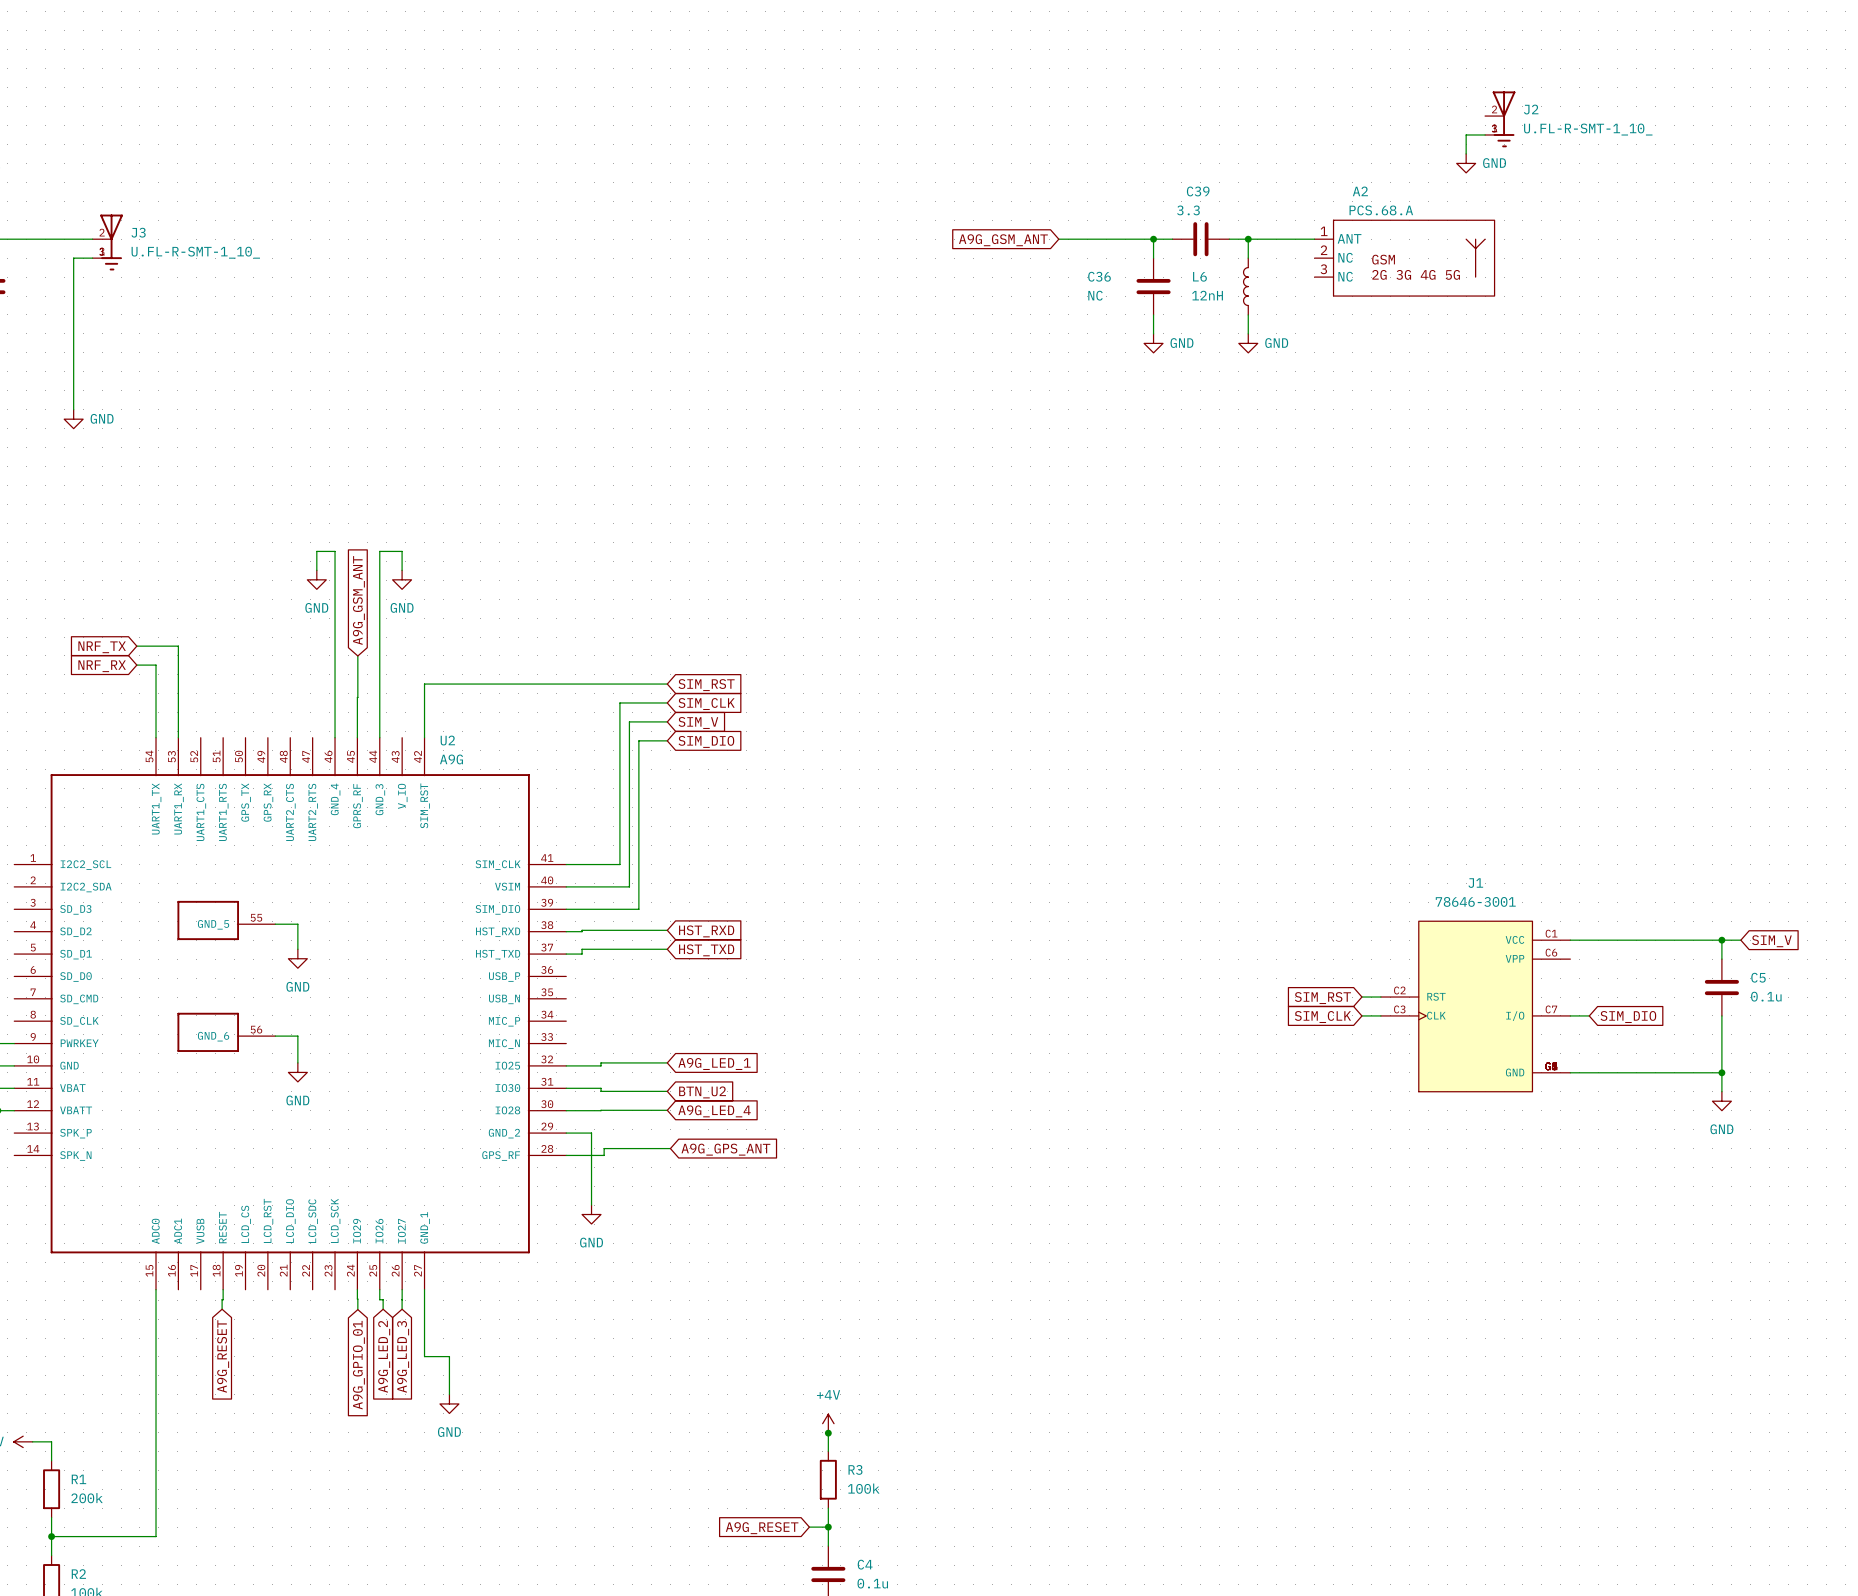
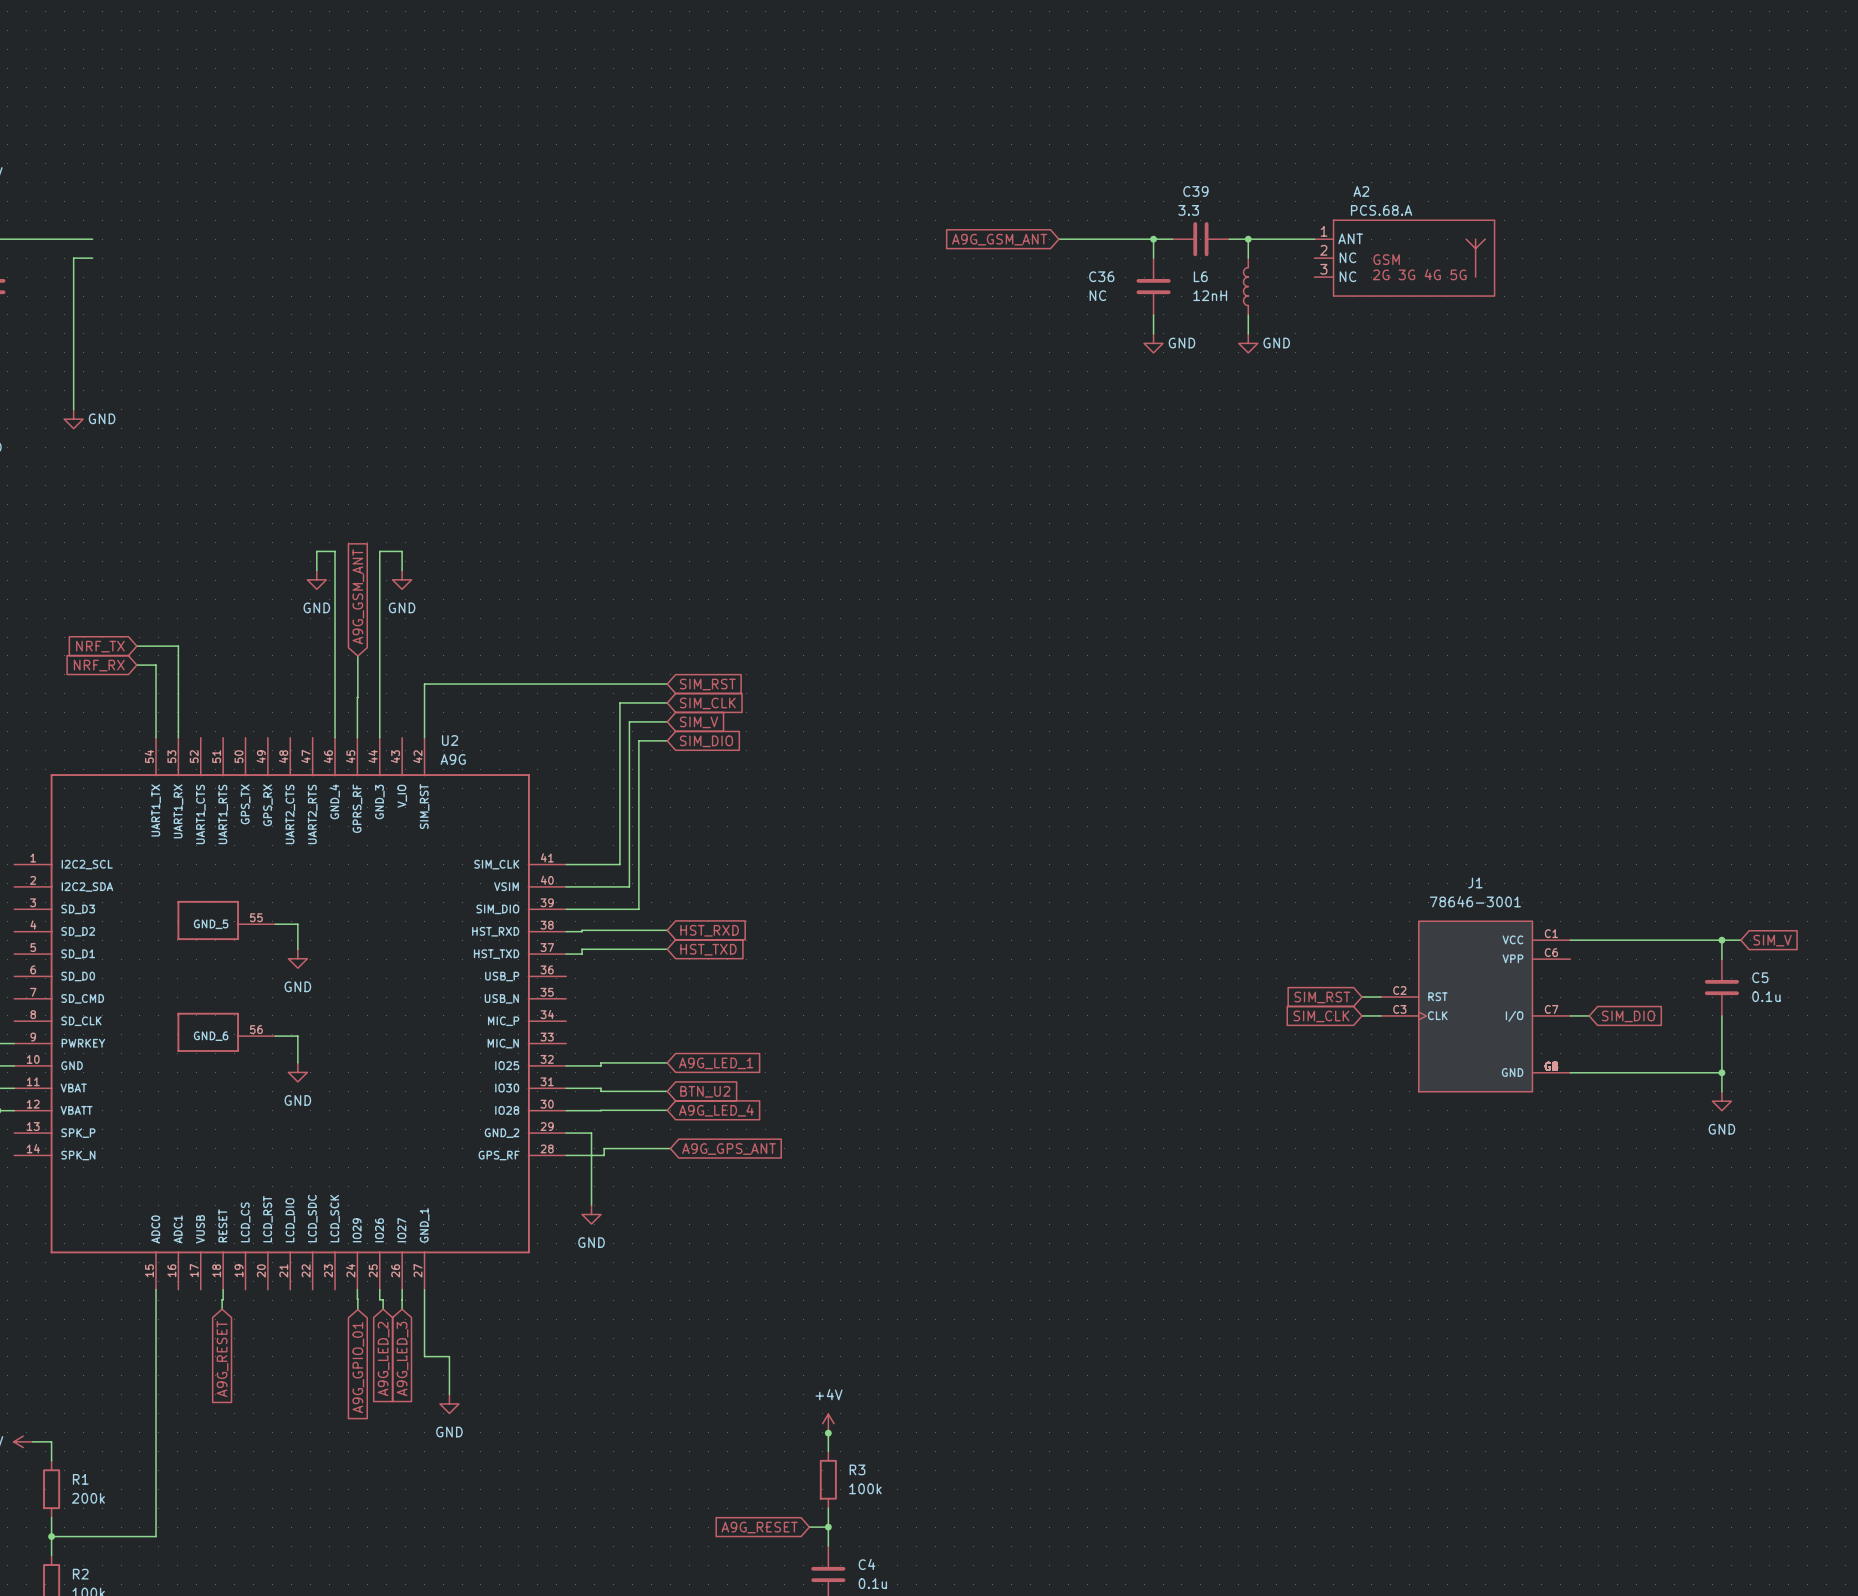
J2: U.FL-R-SMT-1_10_ (1500, 119) -> none
wire: (1485, 134) (1466, 134) (1466, 153) -> none
power symbol: GND (1466, 163) -> none
J3: U.FL-R-SMT-1_10_ (107, 242) -> none

